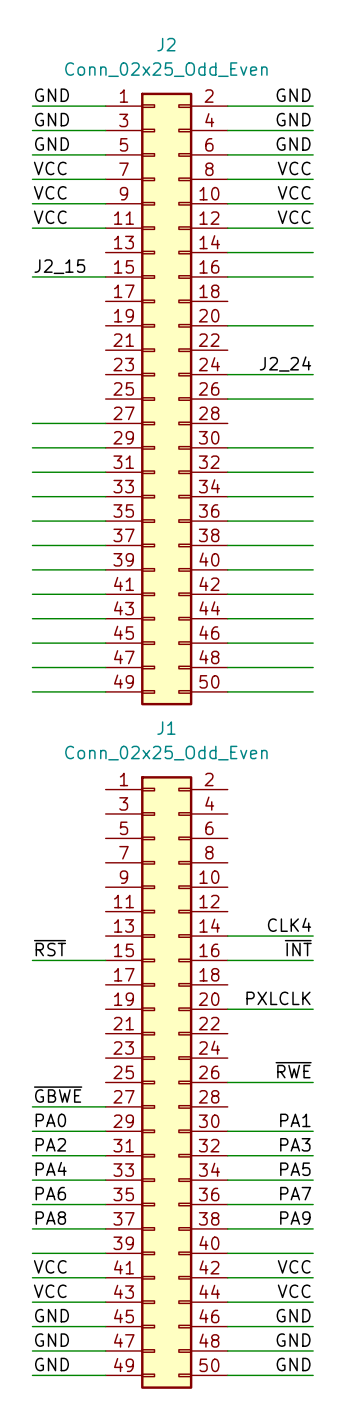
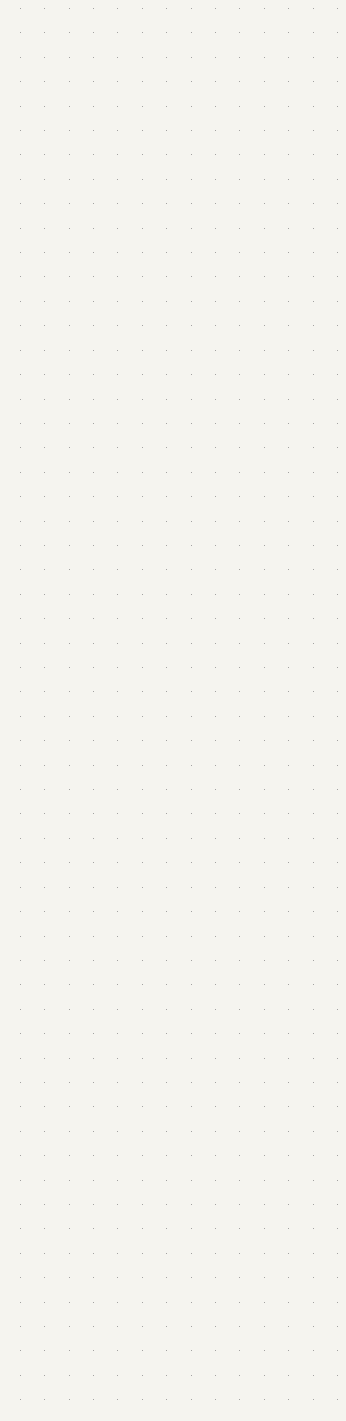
label: GND (52, 95) -> none
label: GND (293, 95) -> none
wire: (32, 106) (105, 106) -> none
wire: (227, 106) (313, 106) -> none
label: GND (52, 119) -> none
label: GND (293, 119) -> none
wire: (32, 130) (105, 130) -> none
wire: (227, 130) (313, 130) -> none
label: GND (52, 144) -> none
label: GND (293, 144) -> none
wire: (32, 154) (105, 154) -> none
wire: (227, 154) (313, 154) -> none
label: VCC (50, 168) -> none
label: VCC (294, 168) -> none
wire: (32, 179) (105, 179) -> none
wire: (227, 179) (313, 179) -> none
label: VCC (50, 192) -> none
label: VCC (294, 192) -> none
wire: (32, 203) (105, 203) -> none
wire: (227, 203) (313, 203) -> none
label: VCC (50, 217) -> none
label: VCC (294, 217) -> none
wire: (32, 228) (105, 228) -> none
wire: (227, 228) (313, 228) -> none
wire: (227, 252) (313, 252) -> none
label: J2_15 (59, 266) -> none
wire: (32, 276) (105, 276) -> none
wire: (227, 276) (313, 276) -> none
wire: (227, 325) (313, 325) -> none
label: J2_24 (285, 364) -> none
wire: (227, 374) (313, 374) -> none
J2: Conn_02x25_Odd_Even (166, 399) -> none
wire: (227, 399) (313, 399) -> none
wire: (32, 423) (105, 423) -> none
wire: (32, 447) (105, 447) -> none
wire: (227, 447) (313, 447) -> none
wire: (32, 472) (105, 472) -> none
wire: (227, 472) (313, 472) -> none
wire: (32, 496) (105, 496) -> none
wire: (227, 496) (313, 496) -> none
wire: (32, 521) (105, 521) -> none
wire: (227, 521) (313, 521) -> none
wire: (32, 545) (105, 545) -> none
wire: (227, 545) (313, 545) -> none
wire: (32, 569) (105, 569) -> none
wire: (227, 569) (313, 569) -> none
wire: (32, 594) (105, 594) -> none
wire: (227, 594) (313, 594) -> none
wire: (32, 618) (105, 618) -> none
wire: (227, 618) (313, 618) -> none
wire: (32, 643) (105, 643) -> none
wire: (227, 643) (313, 643) -> none
wire: (32, 667) (105, 667) -> none
wire: (227, 667) (313, 667) -> none
wire: (32, 691) (105, 691) -> none
wire: (227, 691) (313, 691) -> none
label: CLK4 (289, 924) -> none
wire: (227, 936) (313, 936) -> none
label: ~{RST} (50, 948) -> none
label: ~{INT} (298, 948) -> none
wire: (32, 960) (105, 960) -> none
wire: (227, 960) (313, 960) -> none
label: PXLCLK (278, 998) -> none
wire: (227, 1009) (313, 1009) -> none
label: ~{RWE} (293, 1070) -> none
J1: Conn_02x25_Odd_Even (166, 1082) -> none
wire: (227, 1082) (313, 1082) -> none
label: ~{GBWE} (58, 1094) -> none
wire: (32, 1106) (105, 1106) -> none
label: PA0 (50, 1120) -> none
label: PA1 (295, 1120) -> none
wire: (32, 1131) (105, 1131) -> none
wire: (227, 1131) (313, 1131) -> none
label: PA2 (50, 1144) -> none
label: PA3 (295, 1144) -> none
wire: (32, 1155) (105, 1155) -> none
wire: (227, 1155) (313, 1155) -> none
label: PA4 (51, 1168) -> none
label: PA5 (295, 1169) -> none
wire: (32, 1180) (105, 1180) -> none
wire: (227, 1180) (313, 1180) -> none
label: PA6 (50, 1193) -> none
label: PA7 (295, 1193) -> none
wire: (32, 1204) (105, 1204) -> none
wire: (227, 1204) (313, 1204) -> none
label: PA8 (50, 1218) -> none
label: PA9 (295, 1218) -> none
wire: (32, 1228) (105, 1228) -> none
wire: (227, 1228) (313, 1228) -> none
wire: (32, 1253) (105, 1253) -> none
wire: (227, 1253) (313, 1253) -> none
label: VCC (50, 1266) -> none
label: VCC (294, 1266) -> none
wire: (32, 1277) (105, 1277) -> none
wire: (227, 1277) (313, 1277) -> none
label: VCC (50, 1291) -> none
label: VCC (294, 1291) -> none
wire: (32, 1302) (105, 1302) -> none
wire: (227, 1302) (313, 1302) -> none
label: GND (52, 1315) -> none
label: GND (293, 1315) -> none
wire: (32, 1326) (105, 1326) -> none
wire: (227, 1326) (313, 1326) -> none
label: GND (52, 1340) -> none
label: GND (293, 1340) -> none
wire: (32, 1350) (105, 1350) -> none
wire: (227, 1350) (313, 1350) -> none
label: GND (52, 1364) -> none
label: GND (293, 1364) -> none
wire: (32, 1375) (105, 1375) -> none
wire: (227, 1375) (313, 1375) -> none

